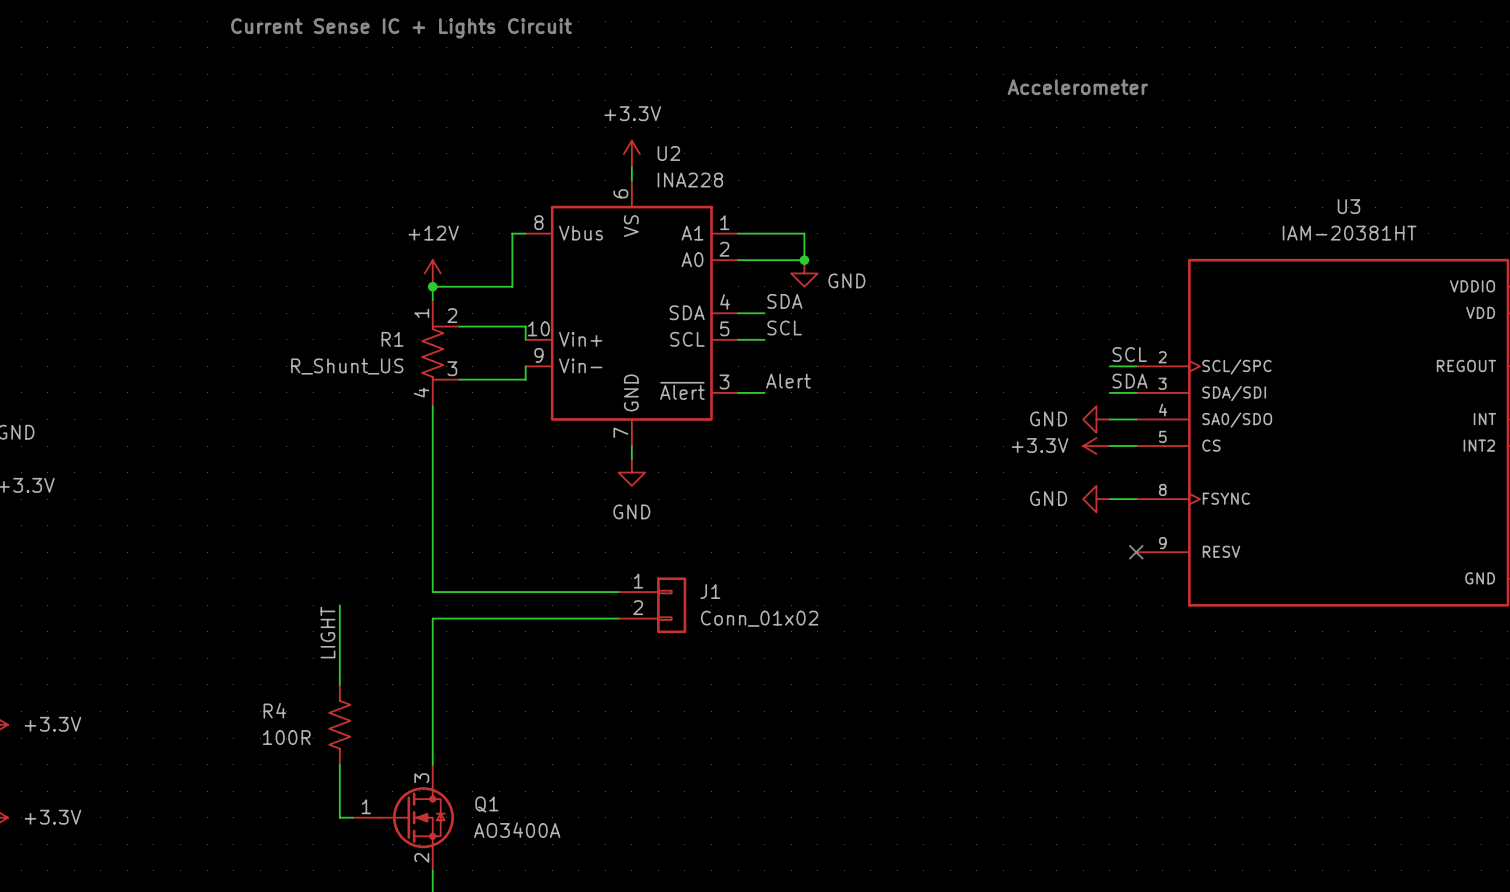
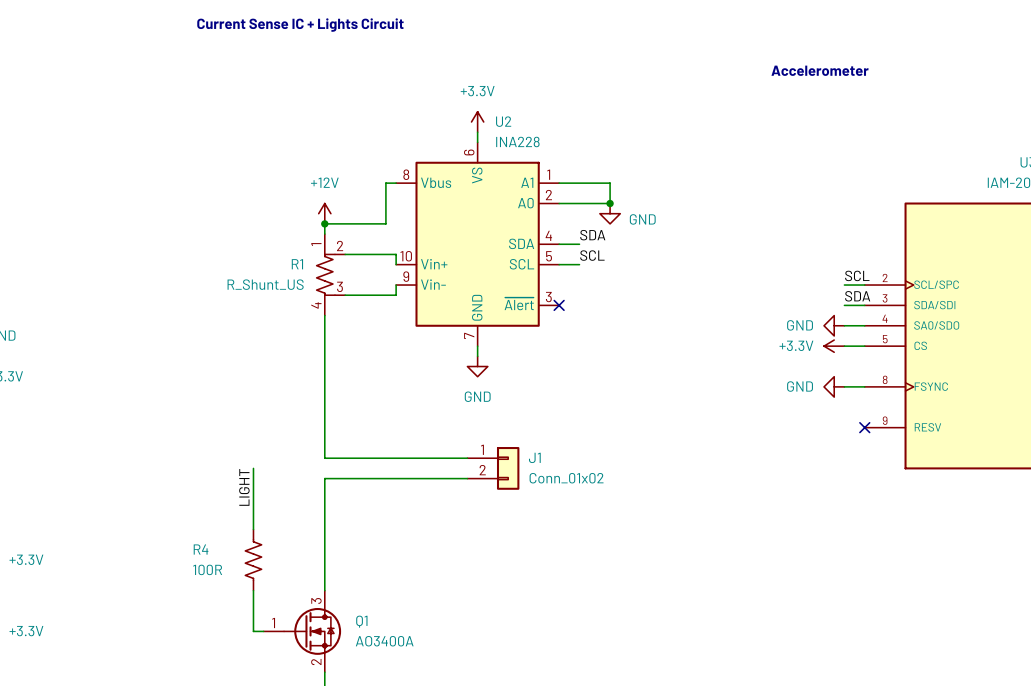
label: Alert (788, 381) -> none
wire: (738, 392) (764, 392) -> none
no-connect mark: none -> (559, 305)

